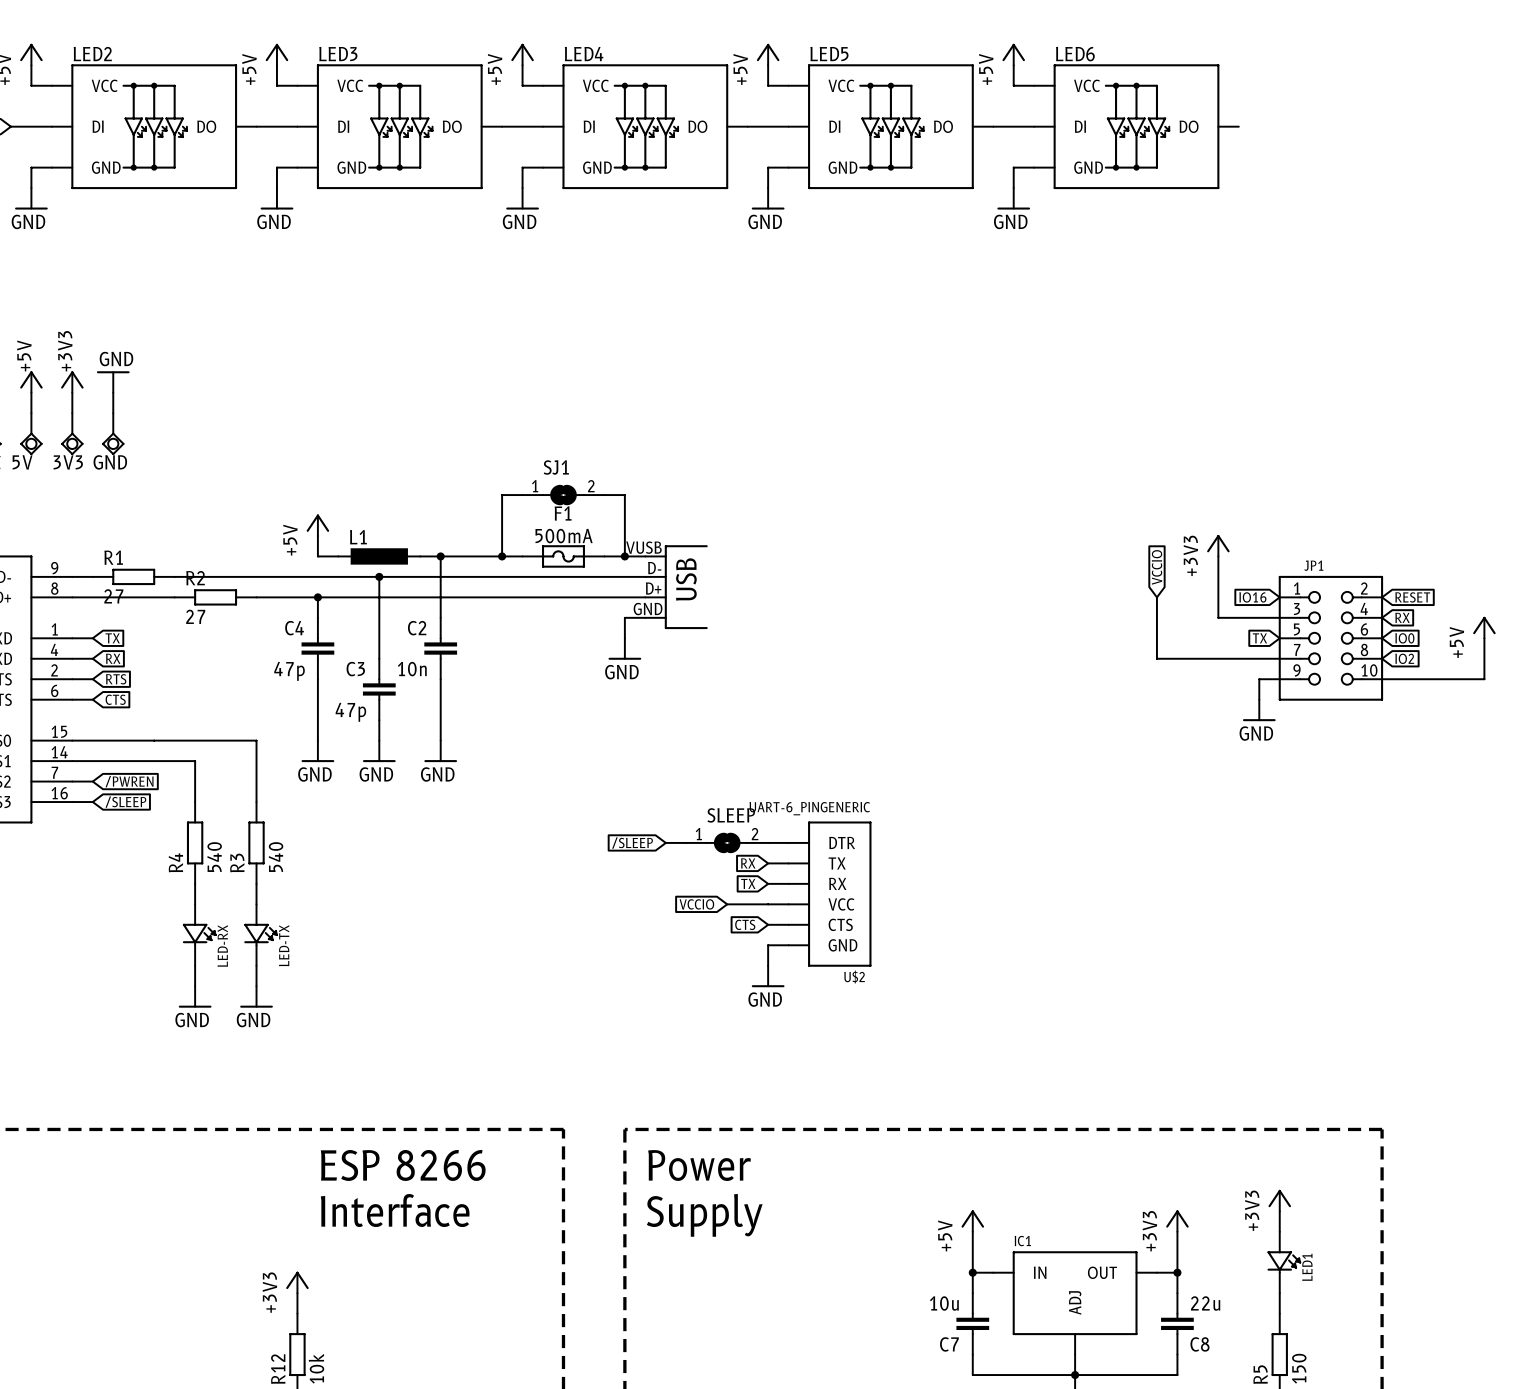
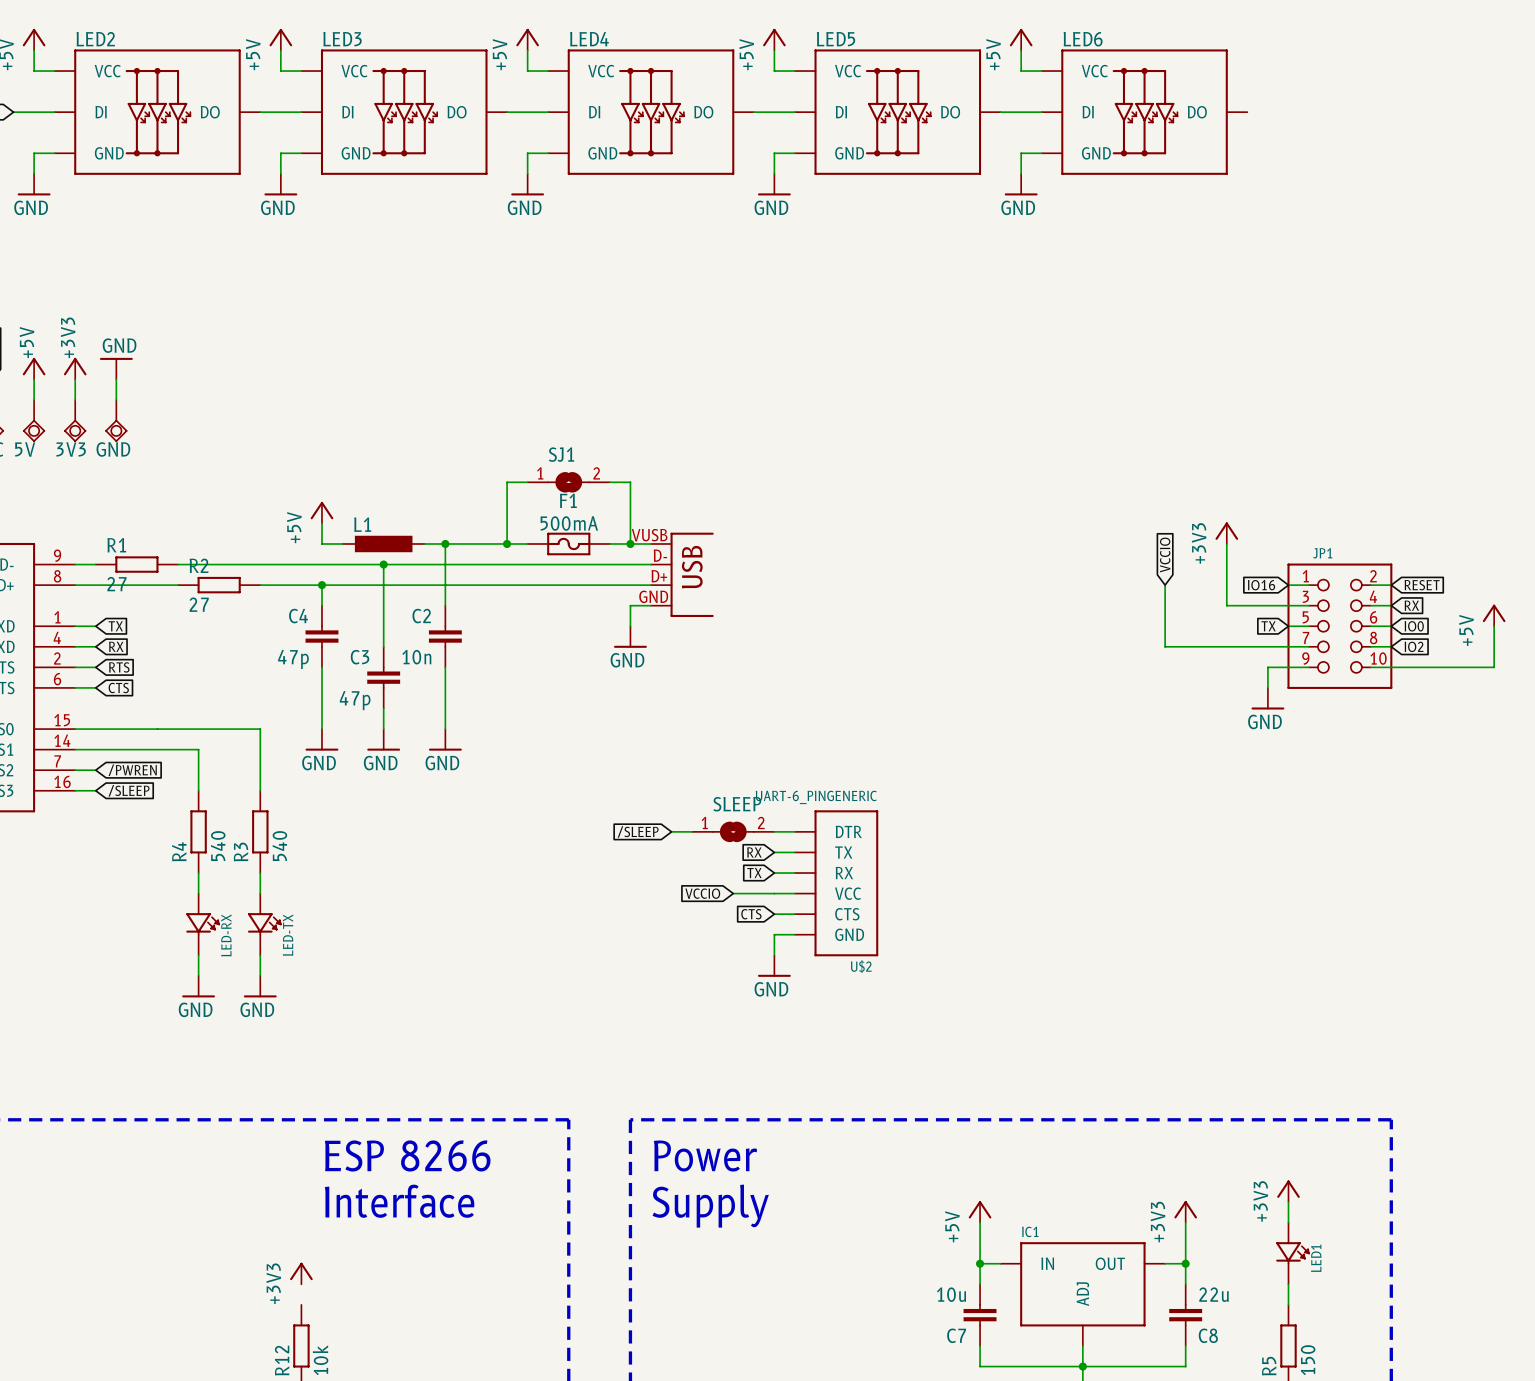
wire: (297, 1293) (297, 1313) -> none

